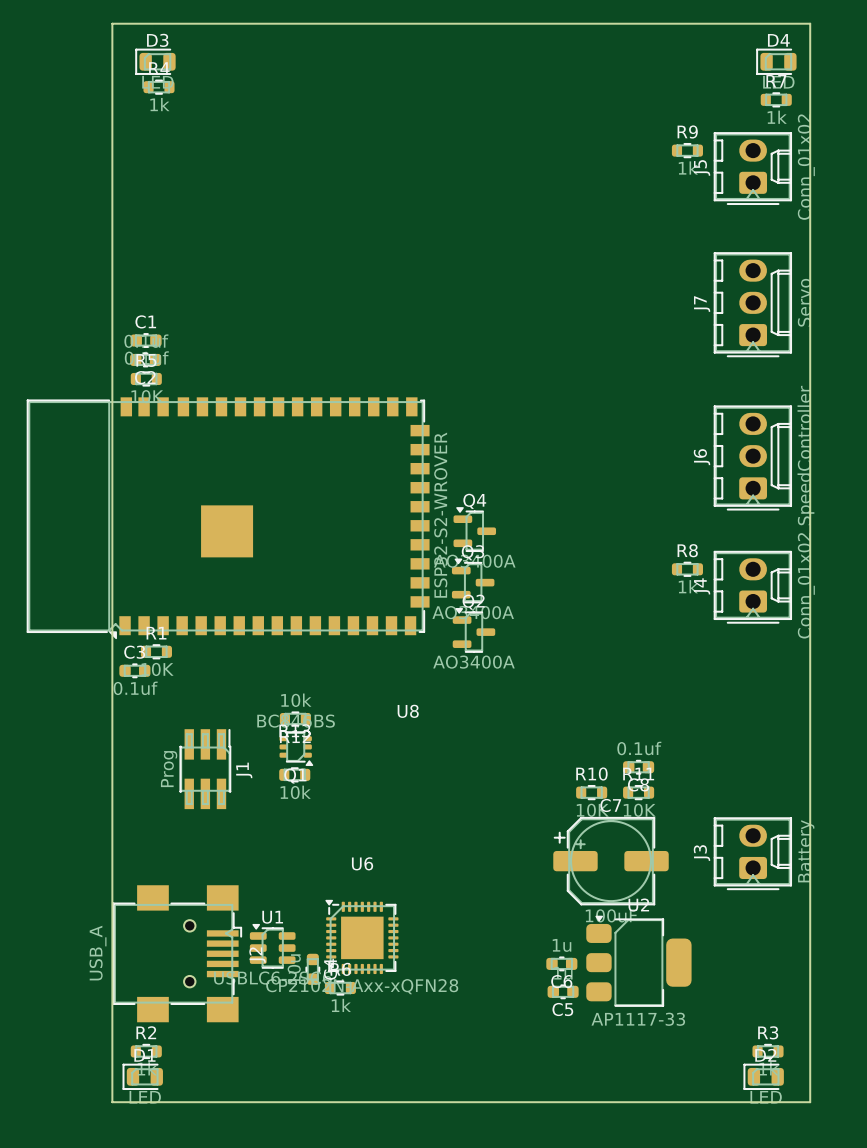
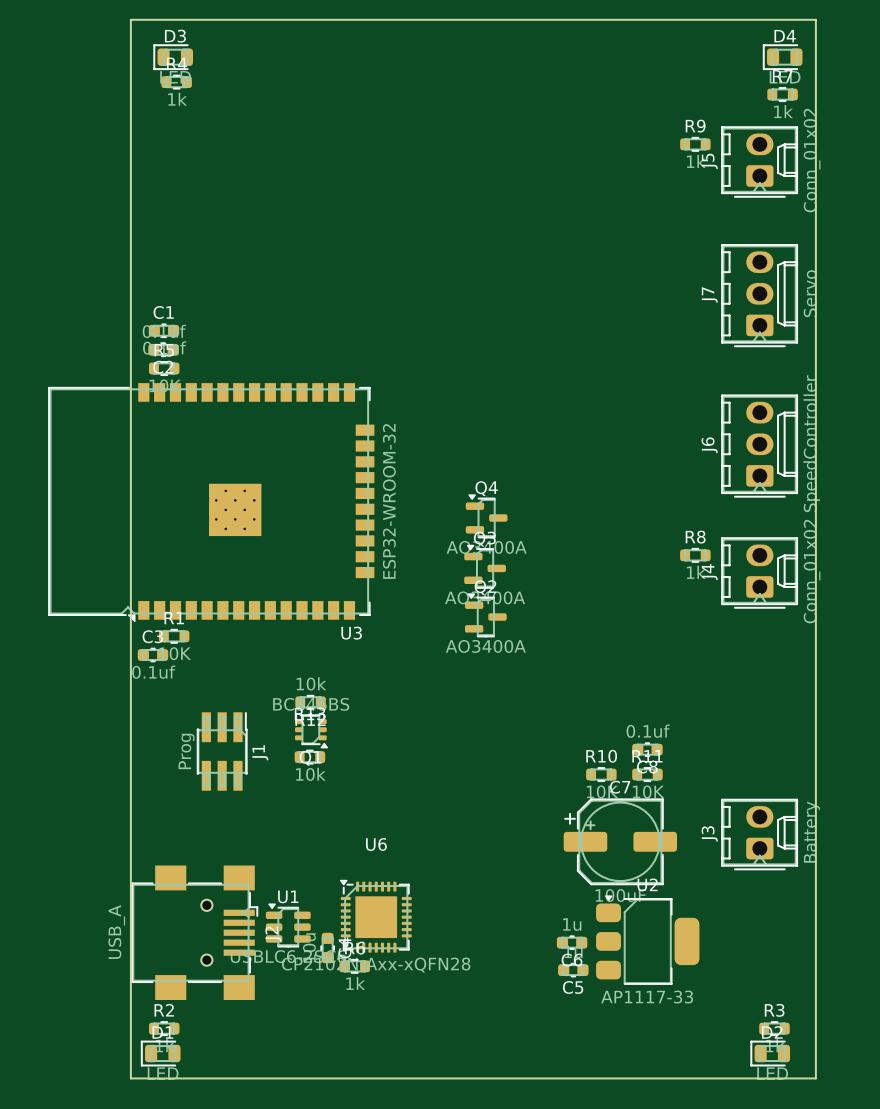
U3: none -> ESP32-WROOM-32 (211, 502)
U8: ESP32-S2-WROVER (228, 518) -> none

